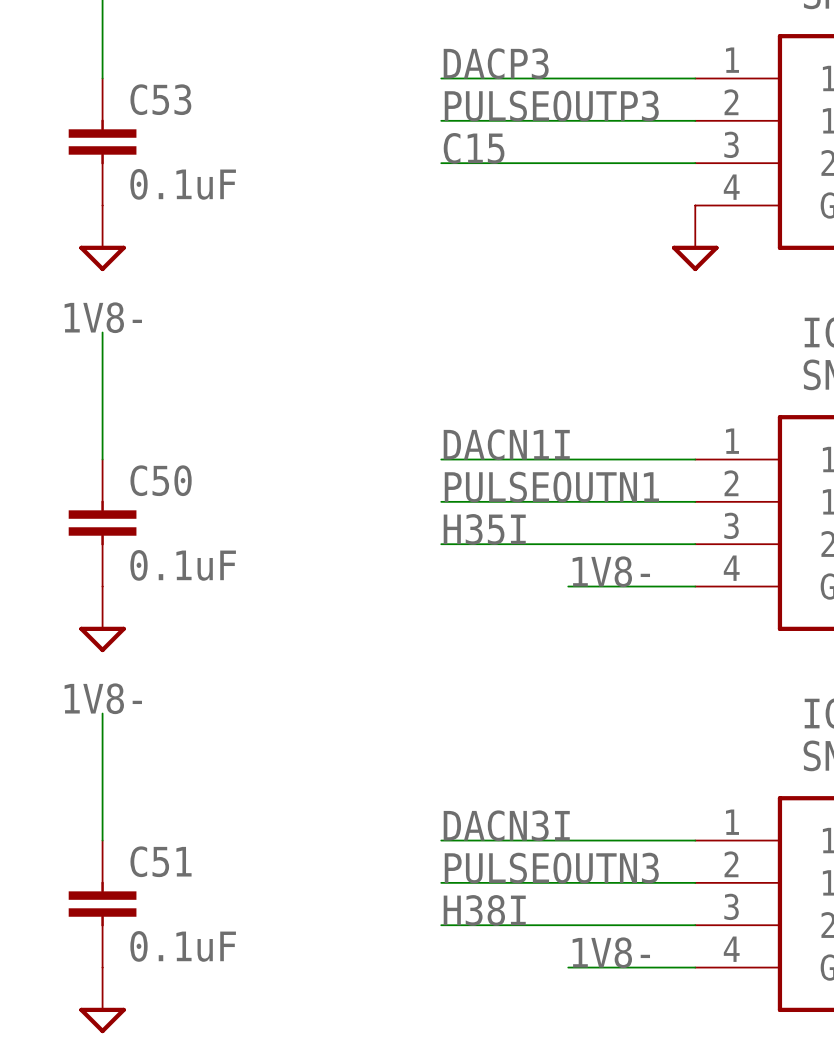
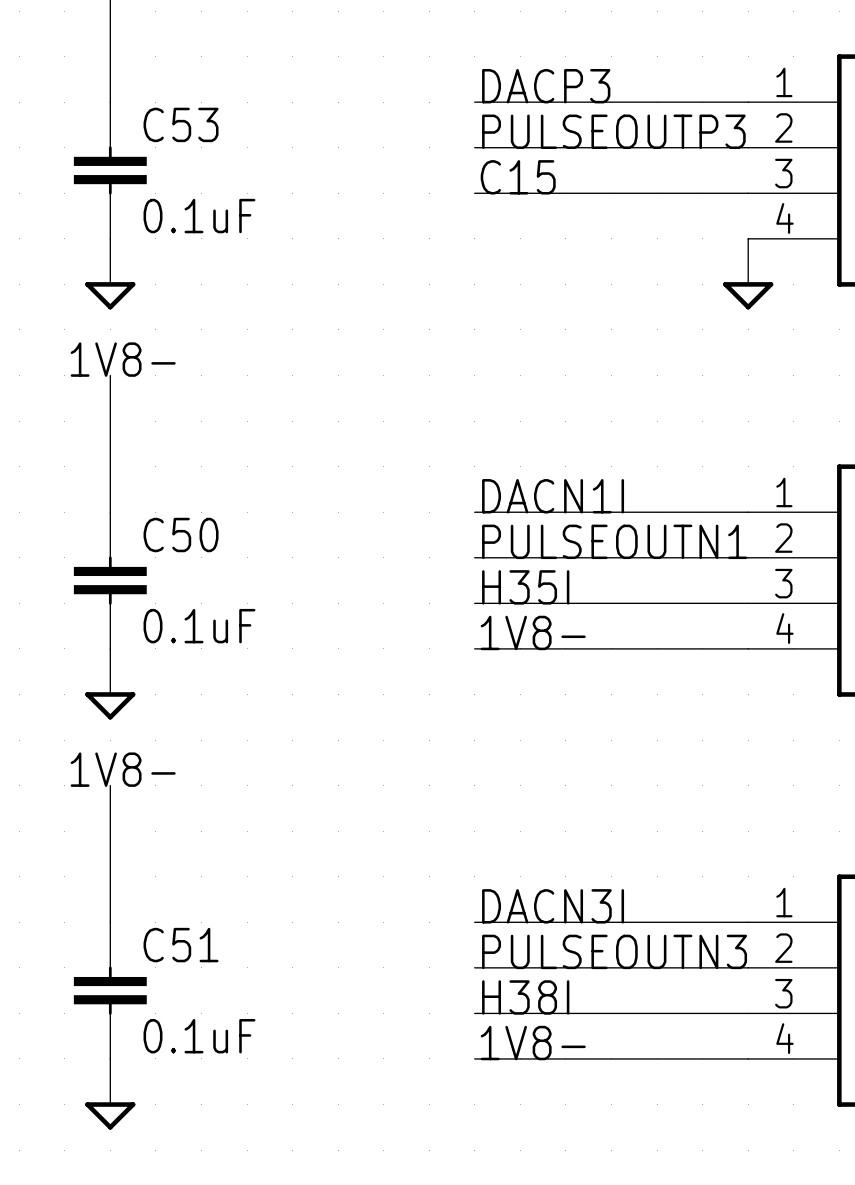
label position: 1V8- (611, 571) -> 1V8- (533, 632)
wire: none -> (474, 648) (611, 648)
label position: 1V8- (611, 952) -> 1V8- (533, 1043)
wire: none -> (474, 1058) (611, 1058)

